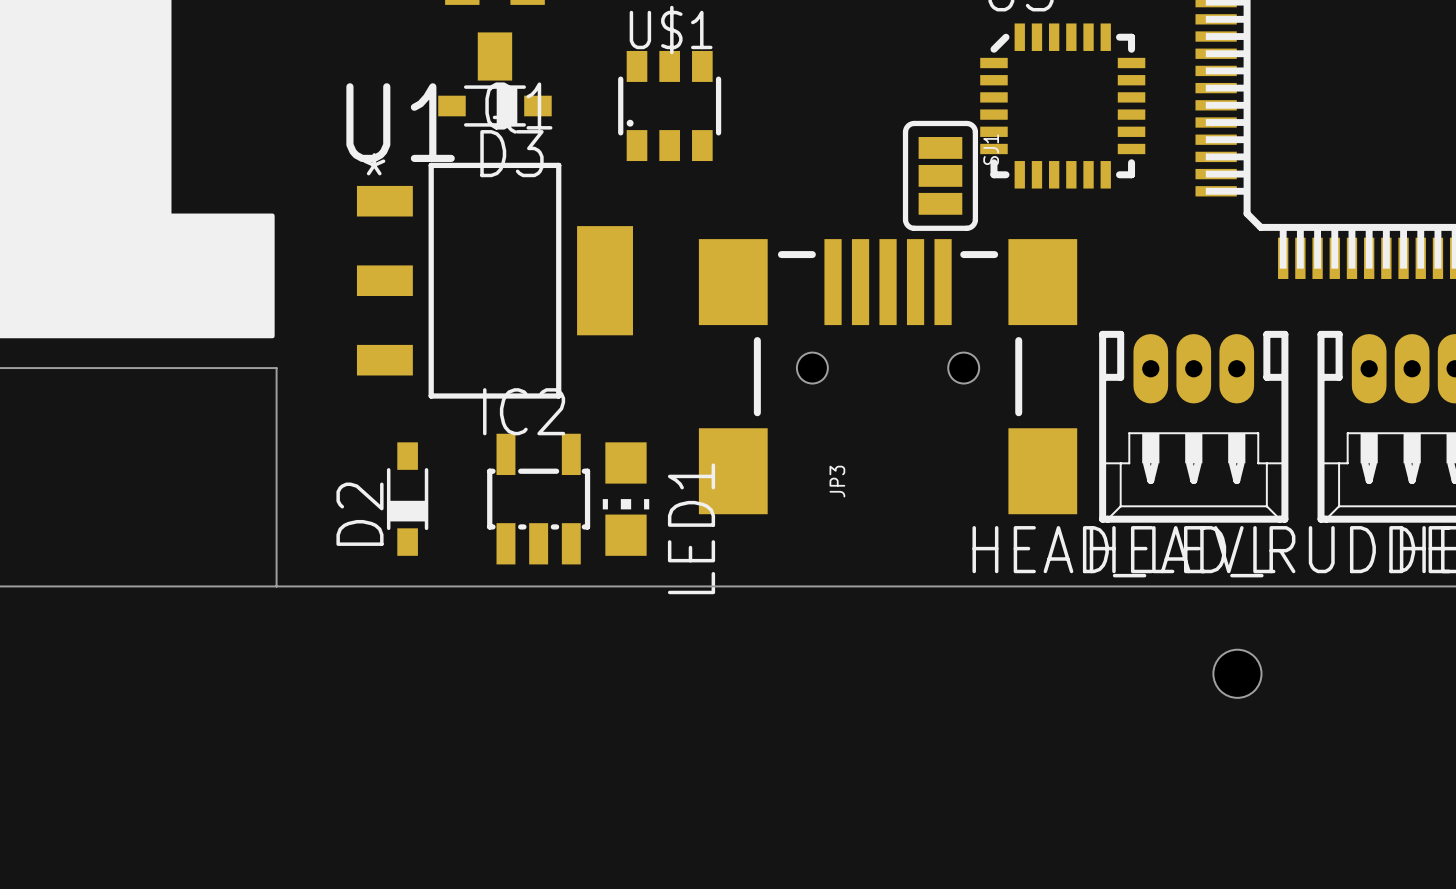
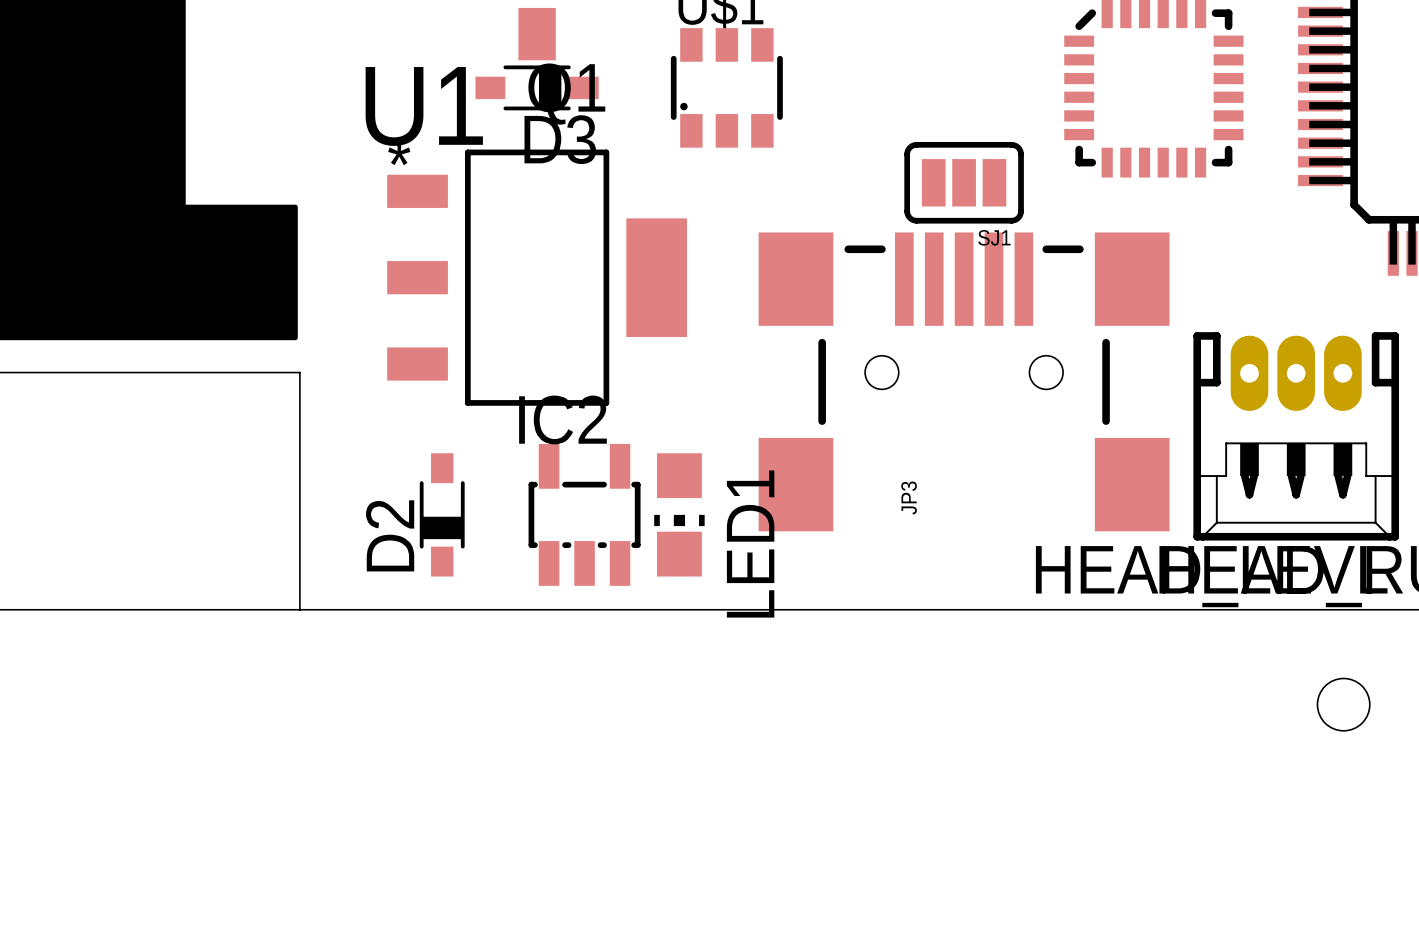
SJ1 rotation: 0° (940, 175) -> 90° clockwise (964, 182)

